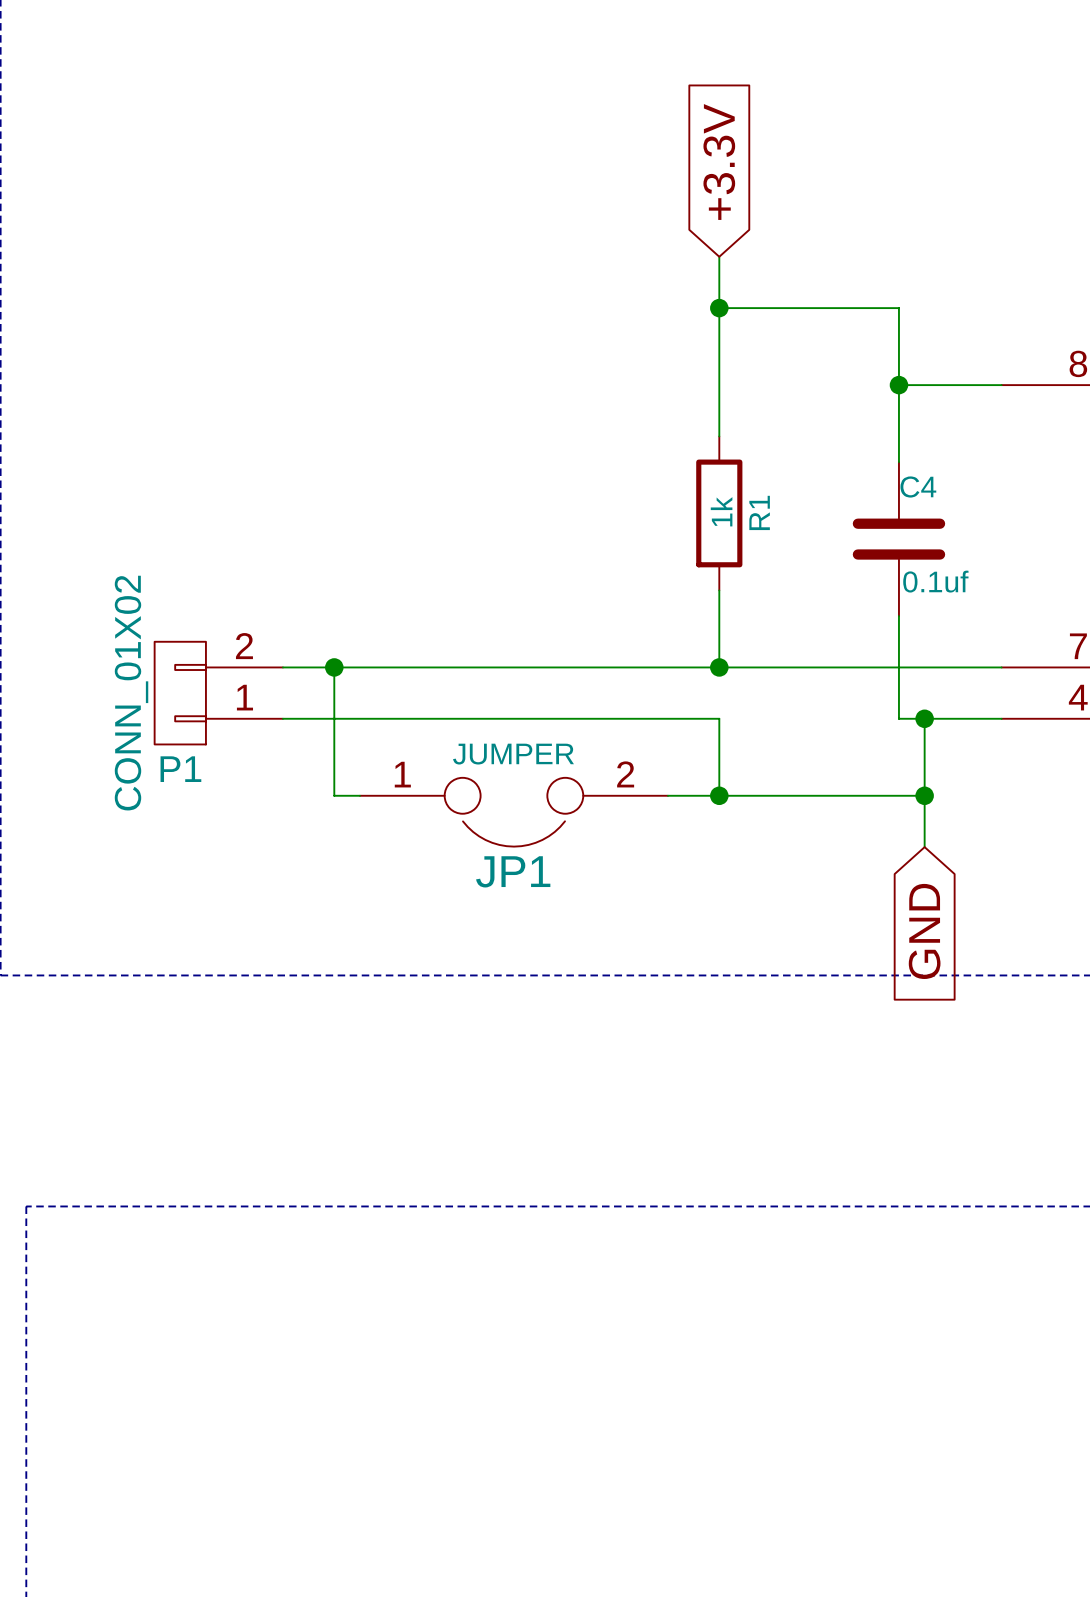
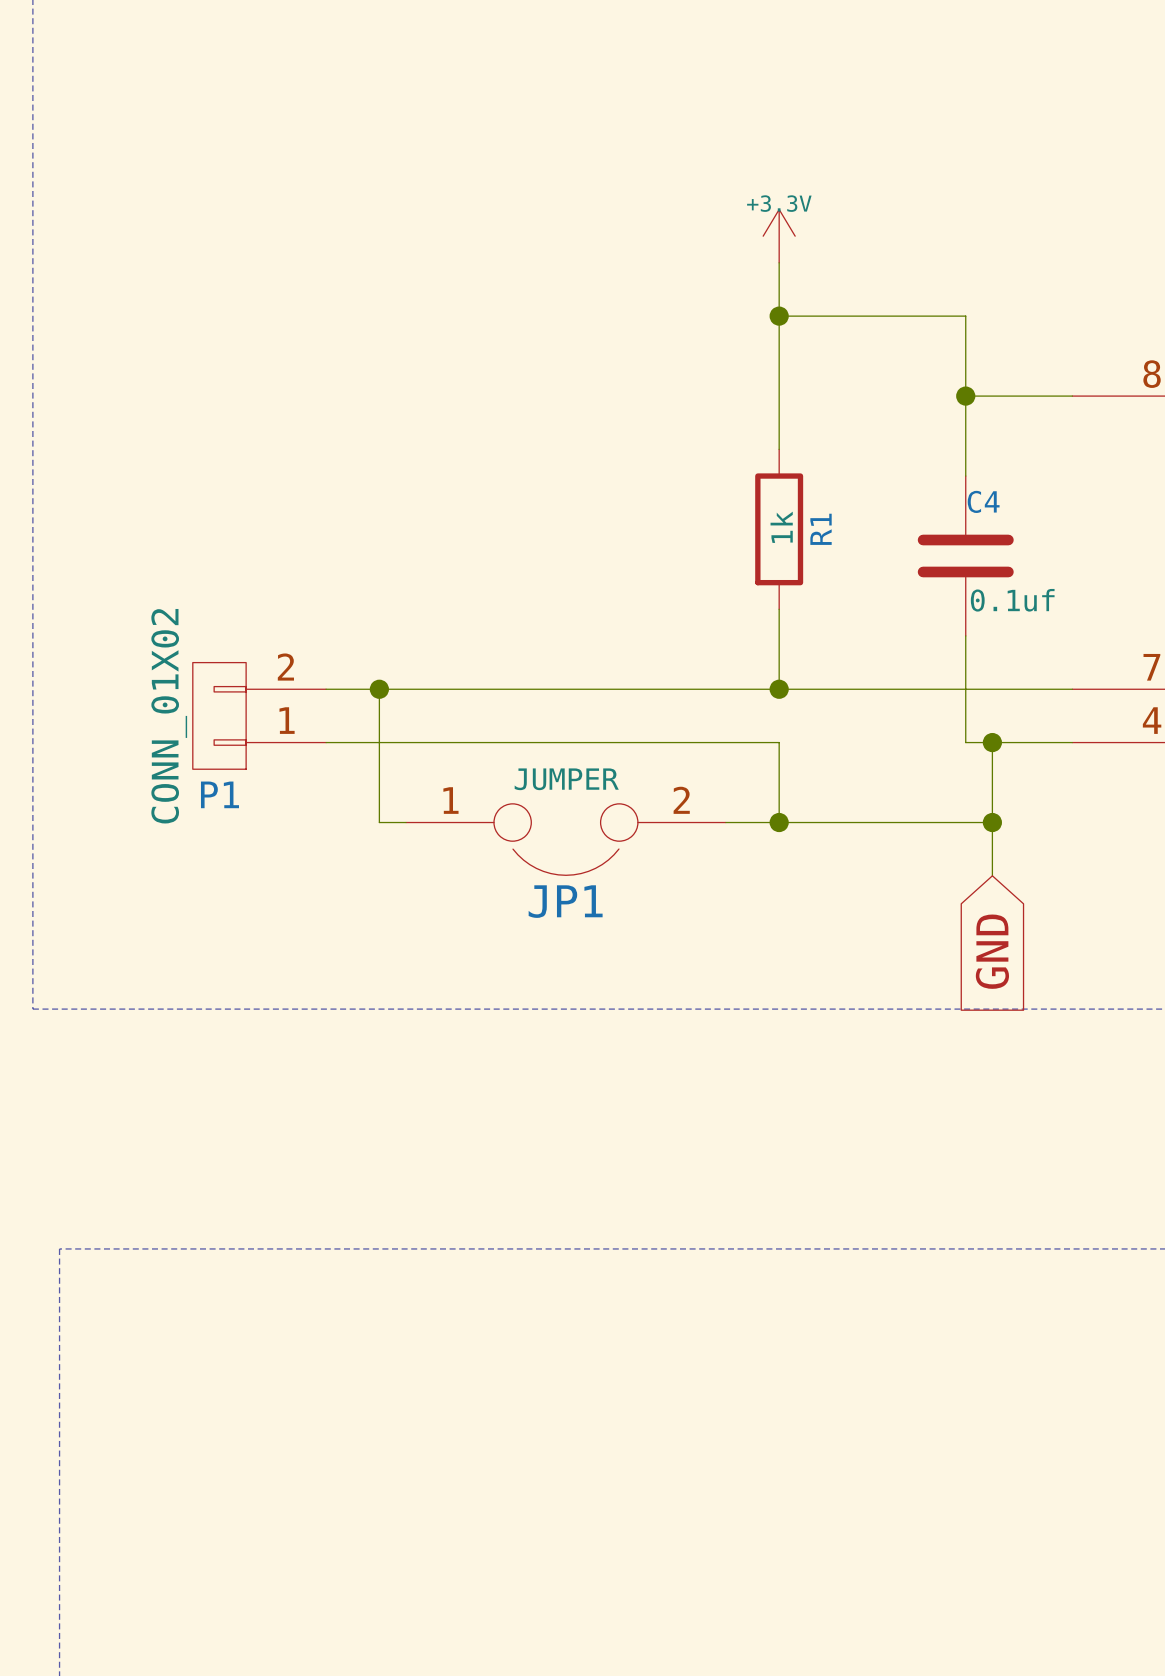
global label: +3.3V (719, 162) -> none
power symbol: none -> +3.3V (779, 236)

